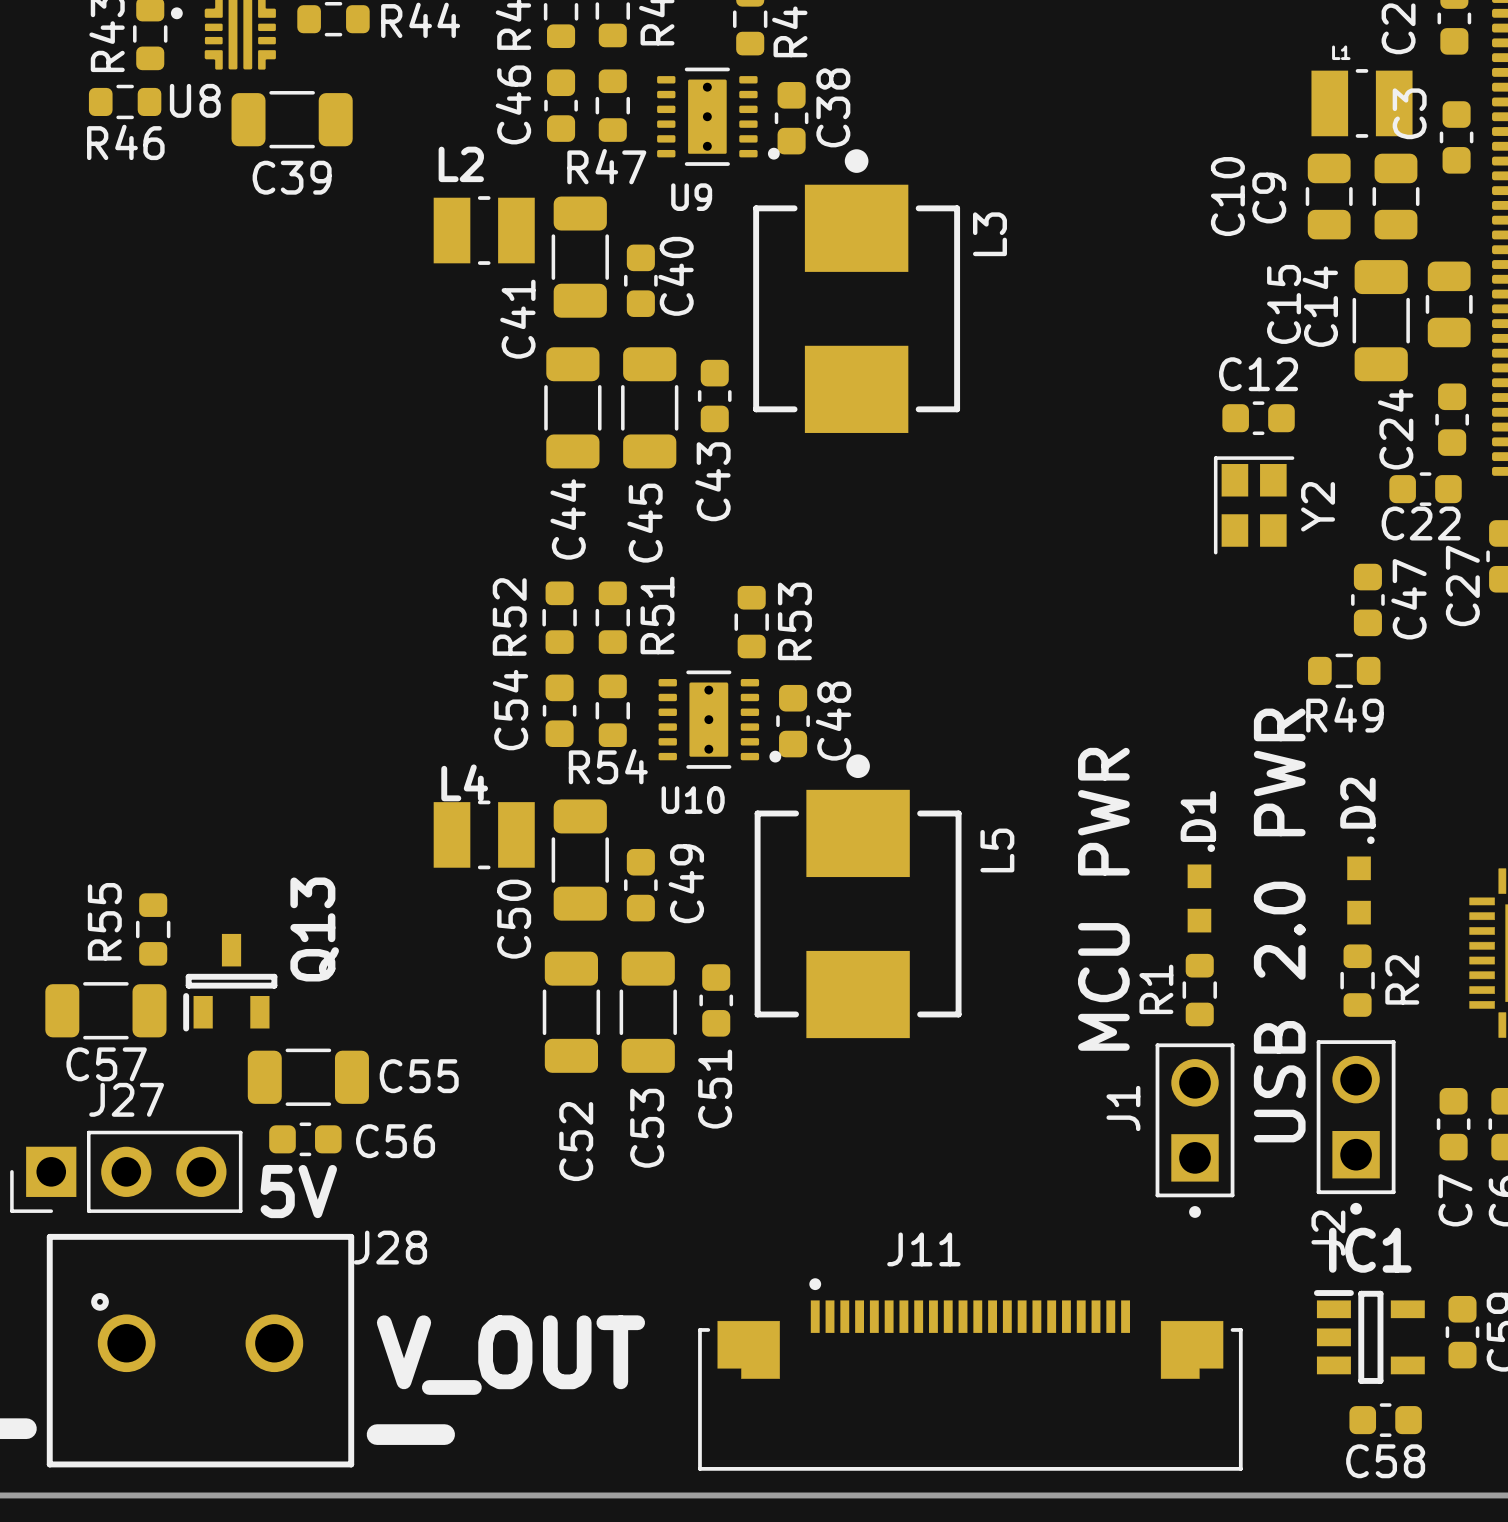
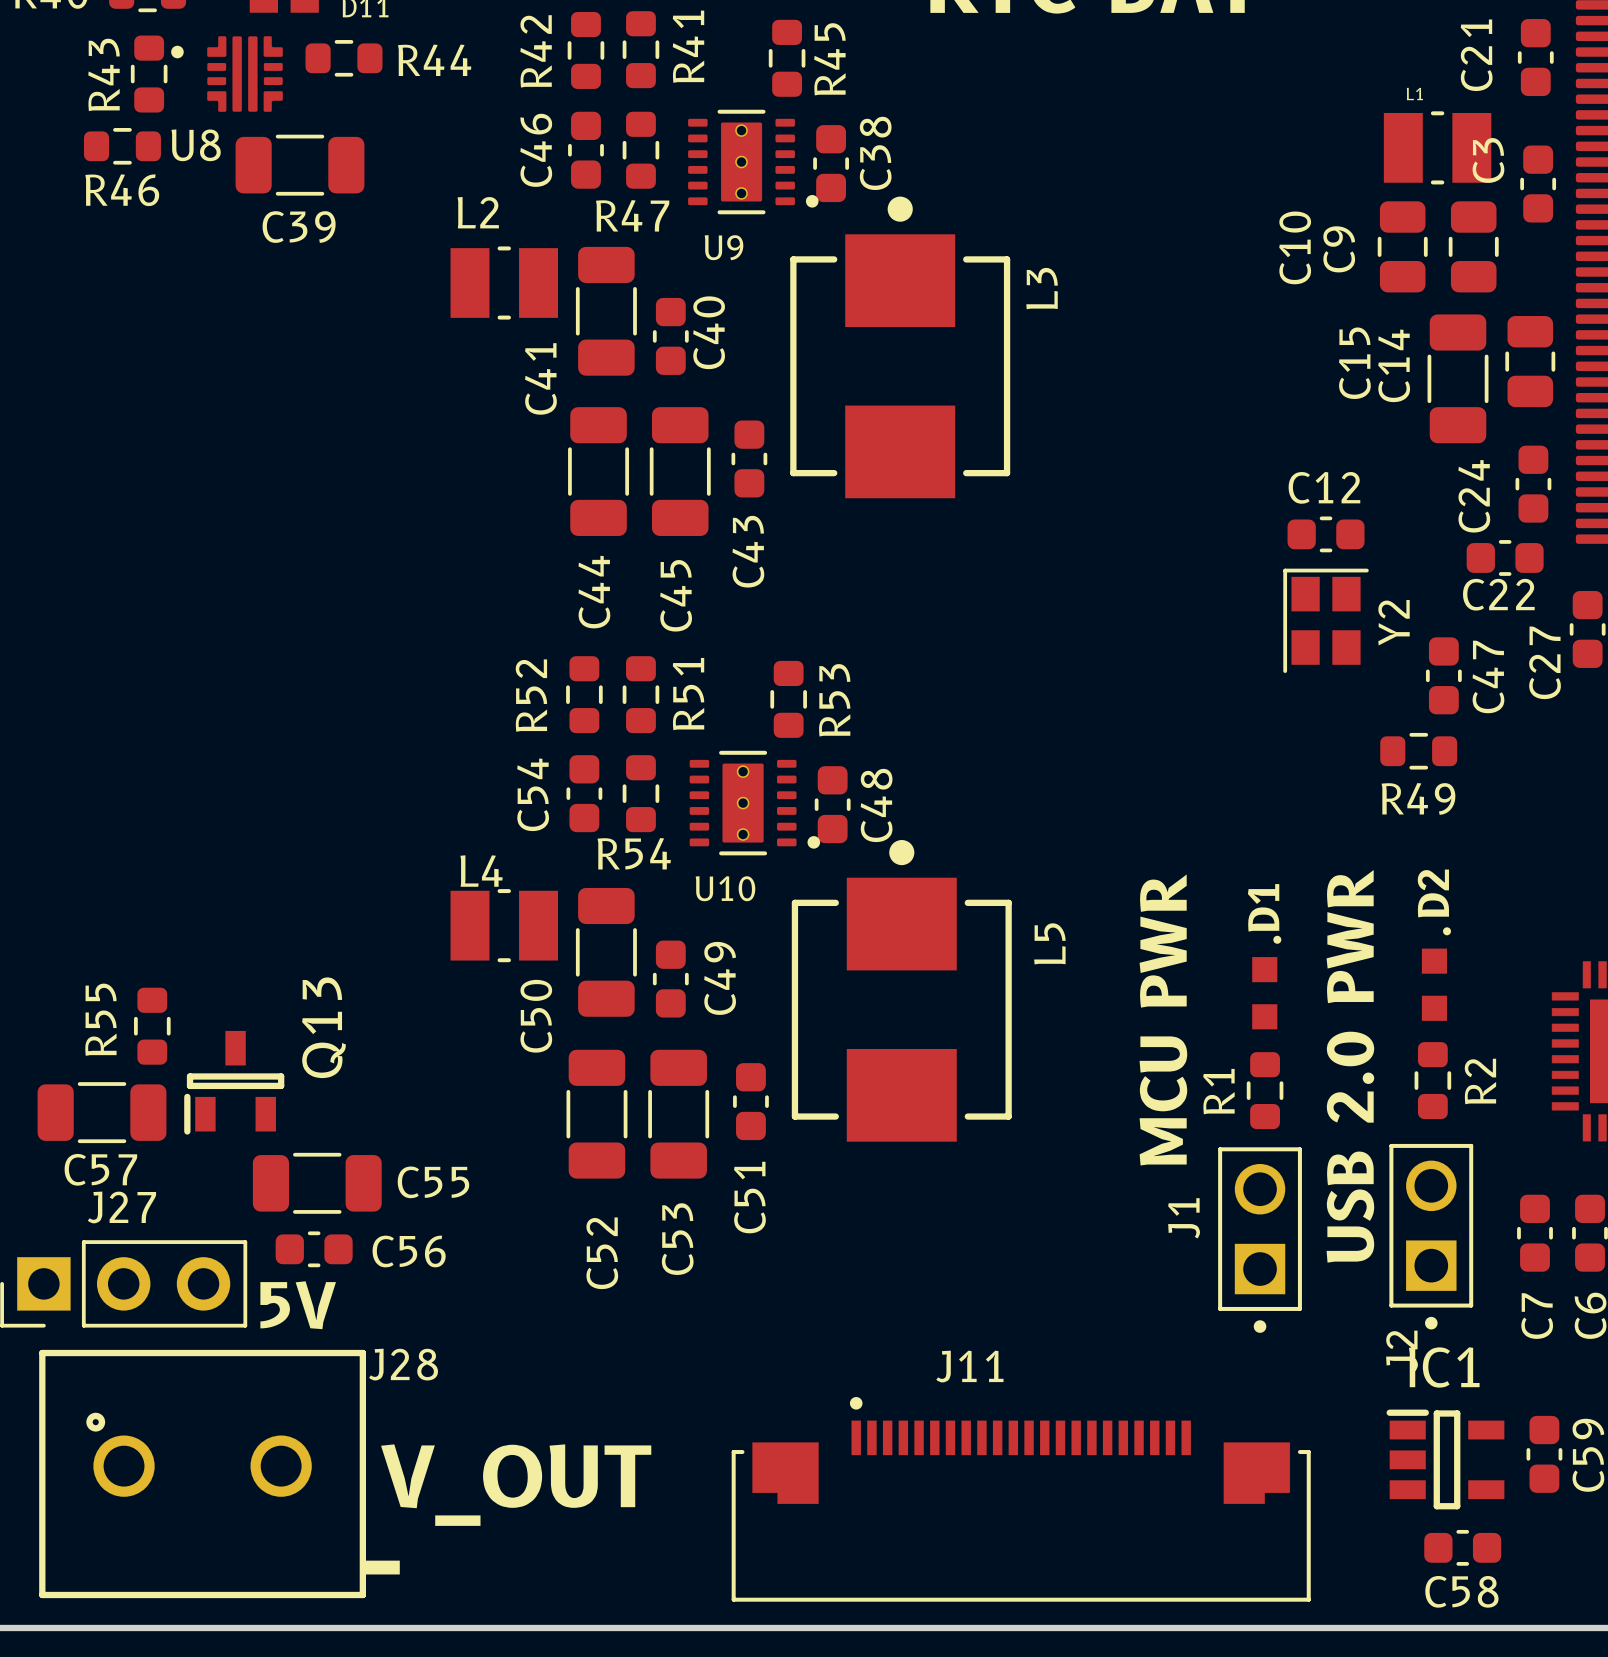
C12 position: (1258, 418) -> (1326, 534)
Y2 position: (1254, 505) -> (1326, 620)

